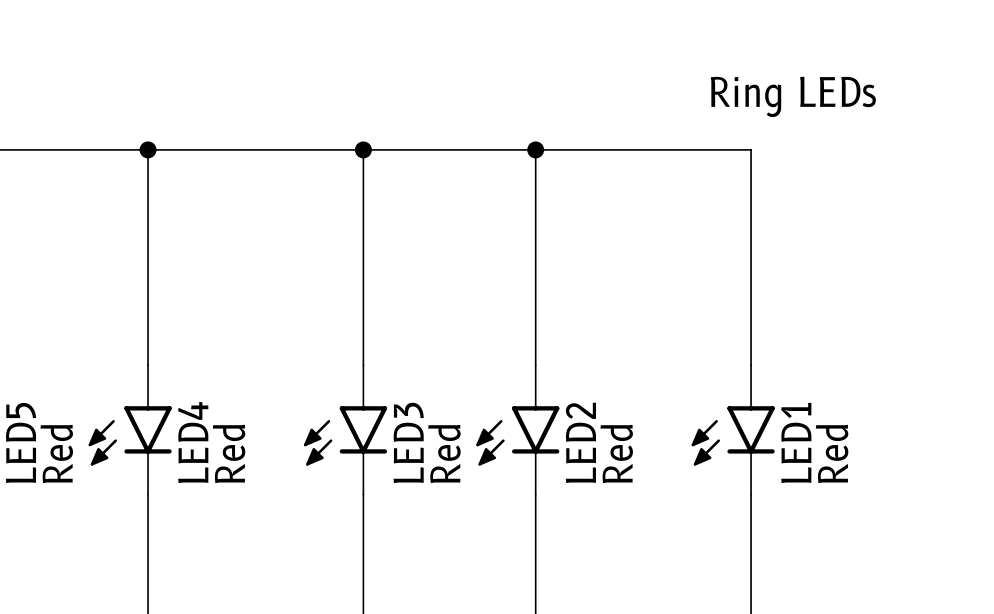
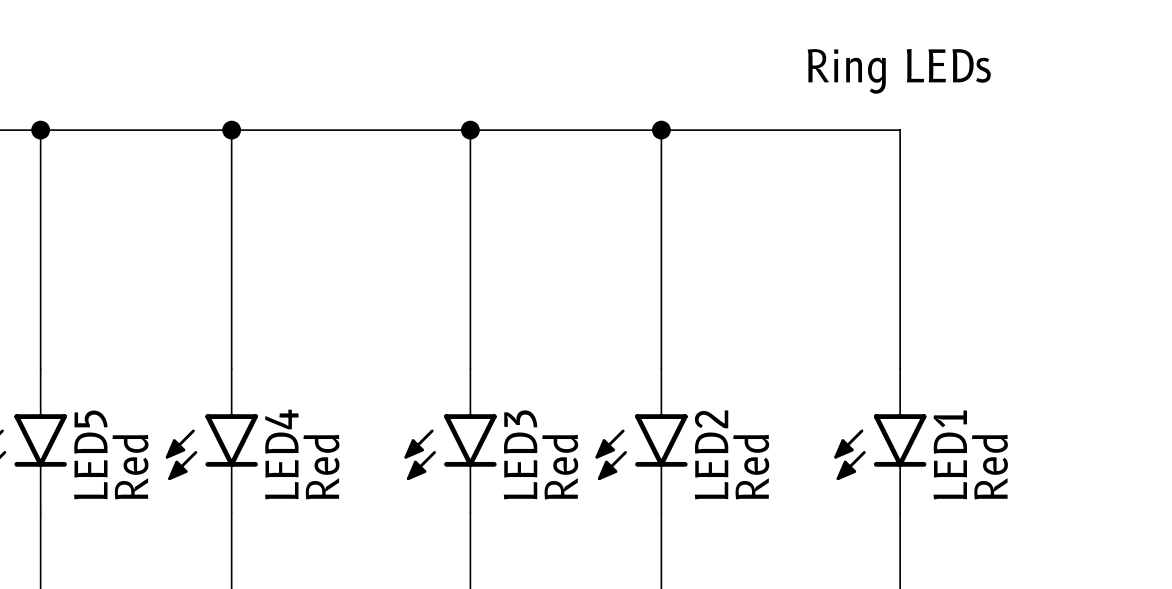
text position: Ring LEDs (793, 96) -> Ring LEDs (899, 71)

